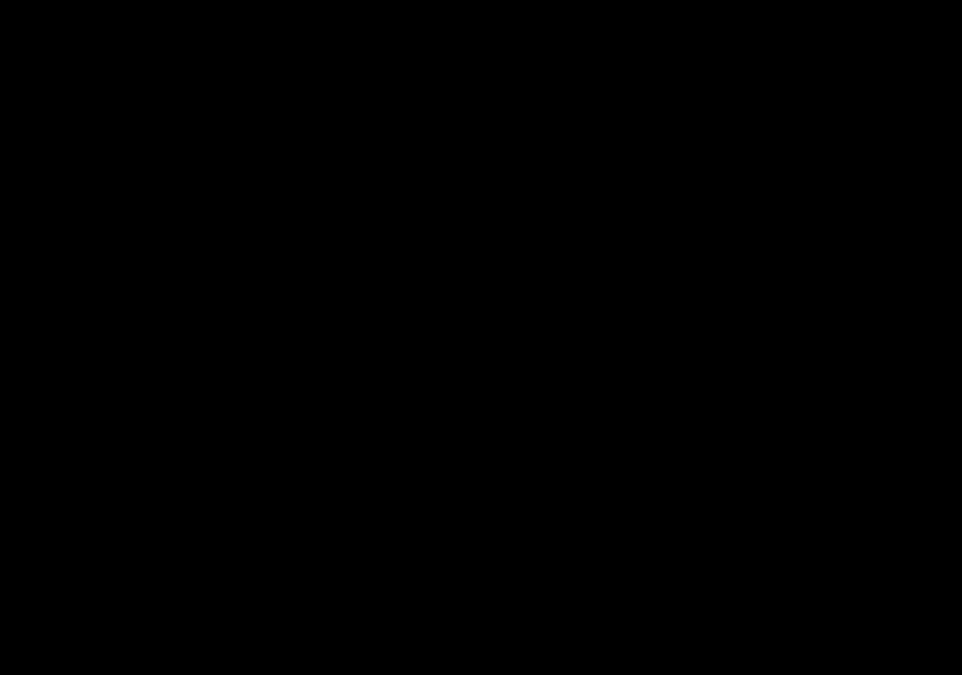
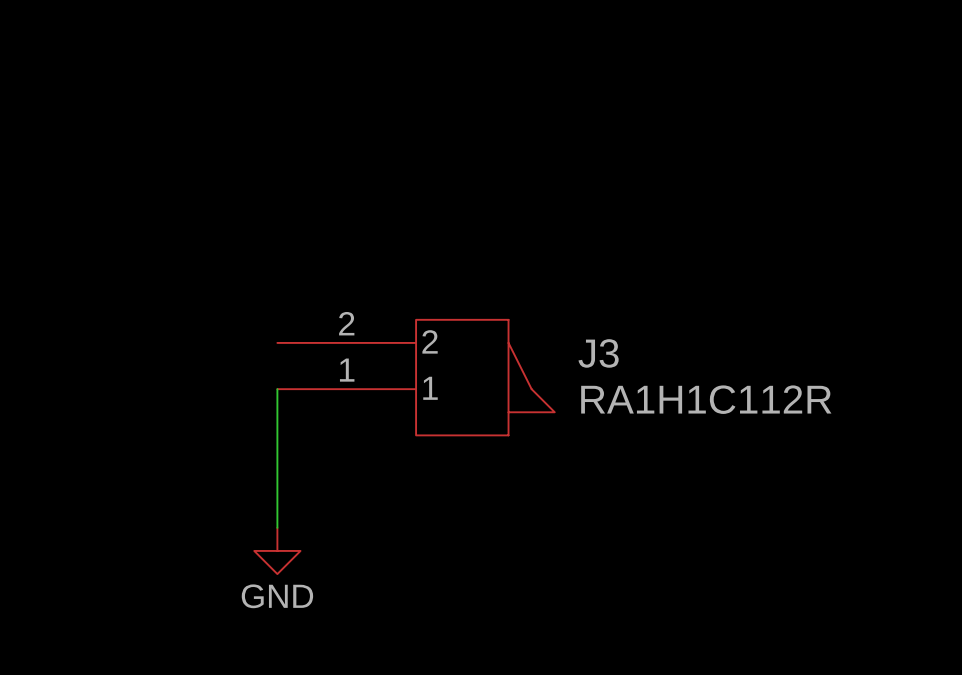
J3: none -> RA1H1C112R (416, 377)
wire: none -> (277, 389) (277, 527)
power symbol: none -> GND (277, 550)

